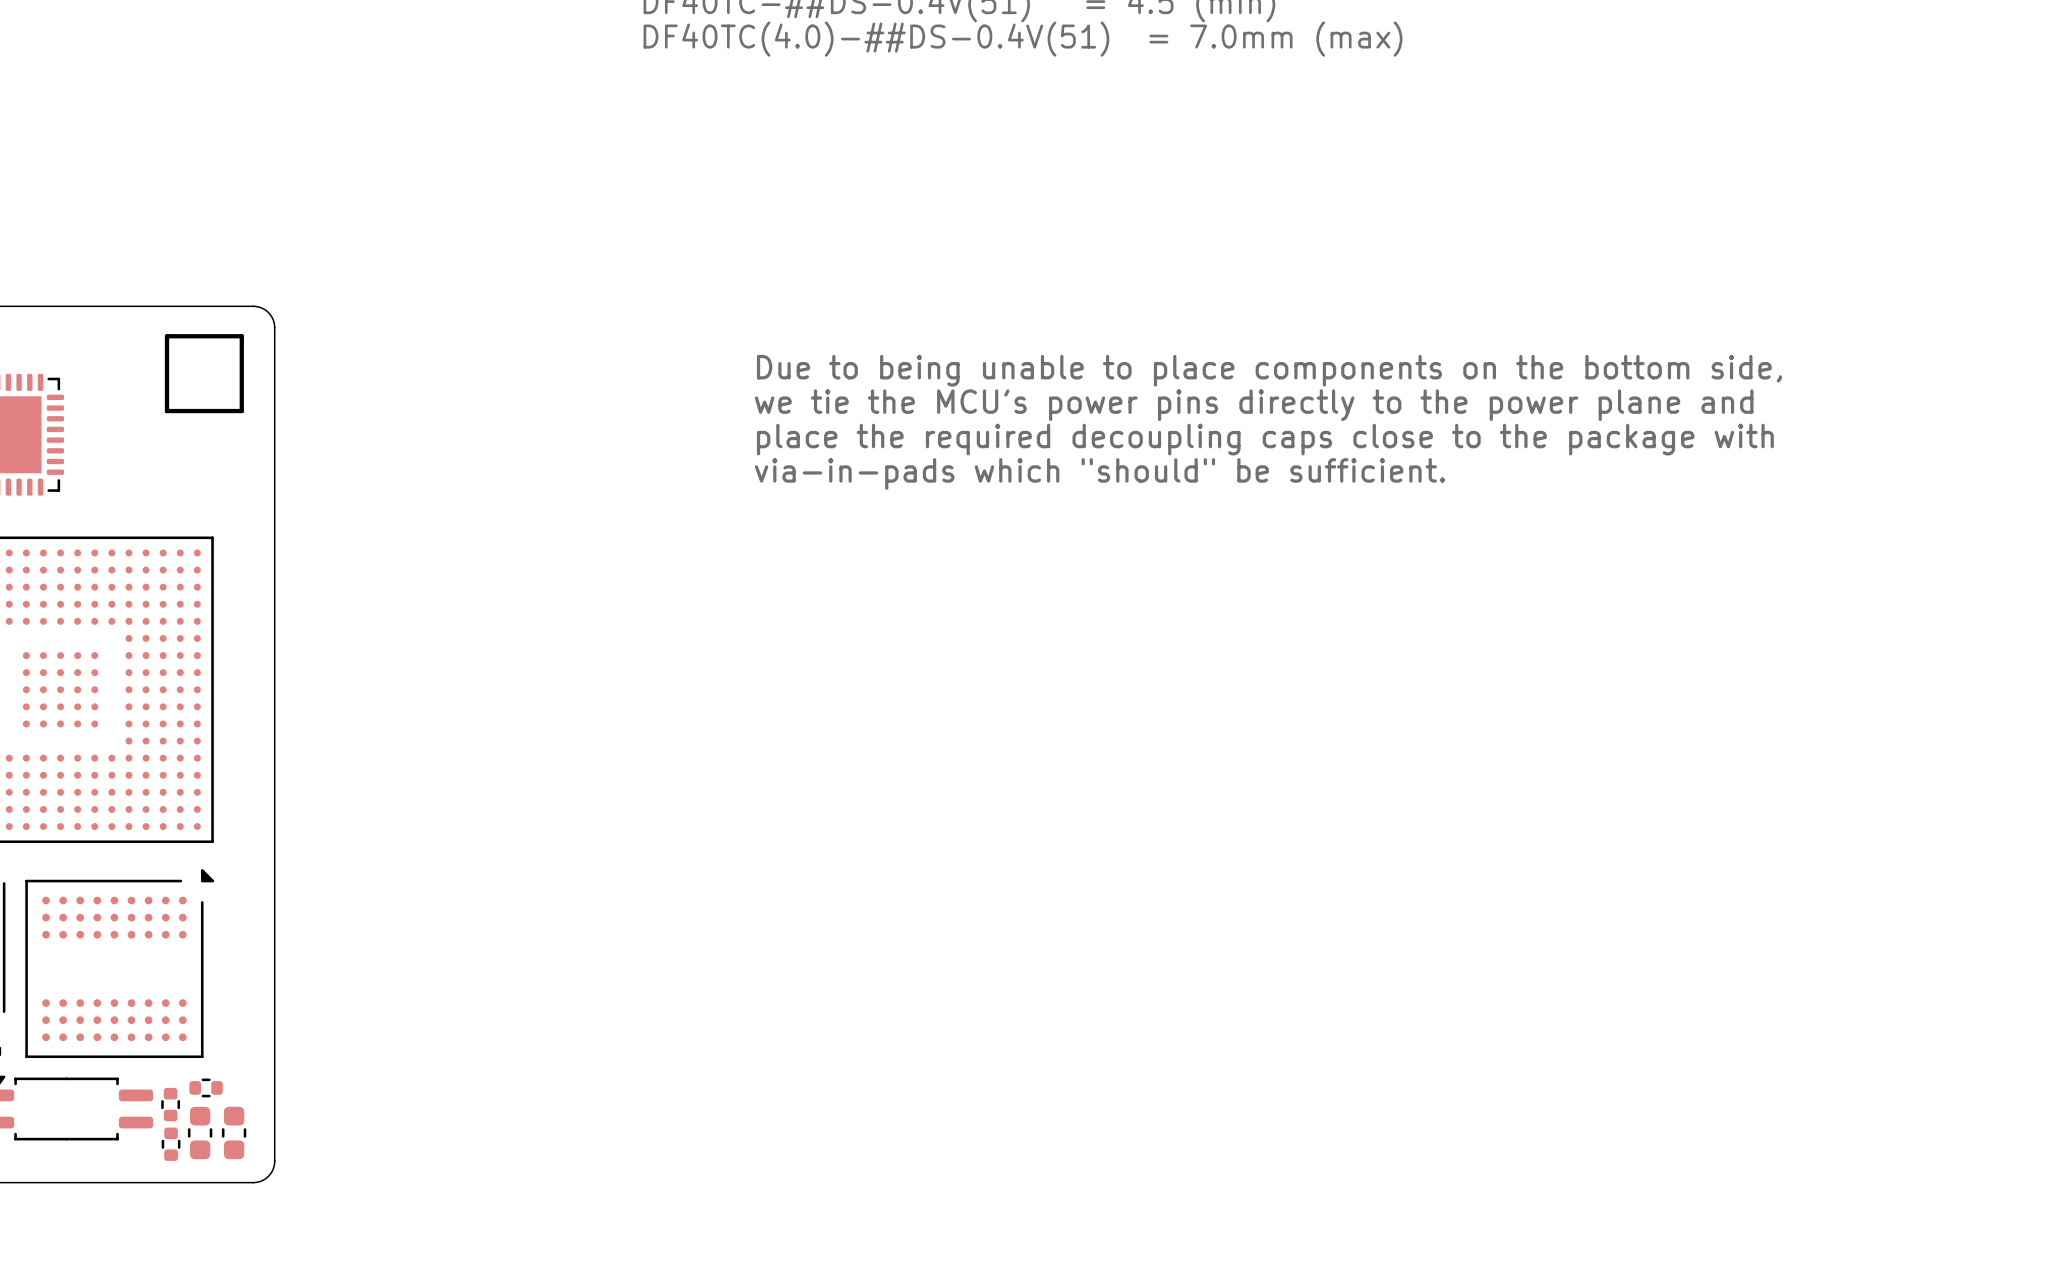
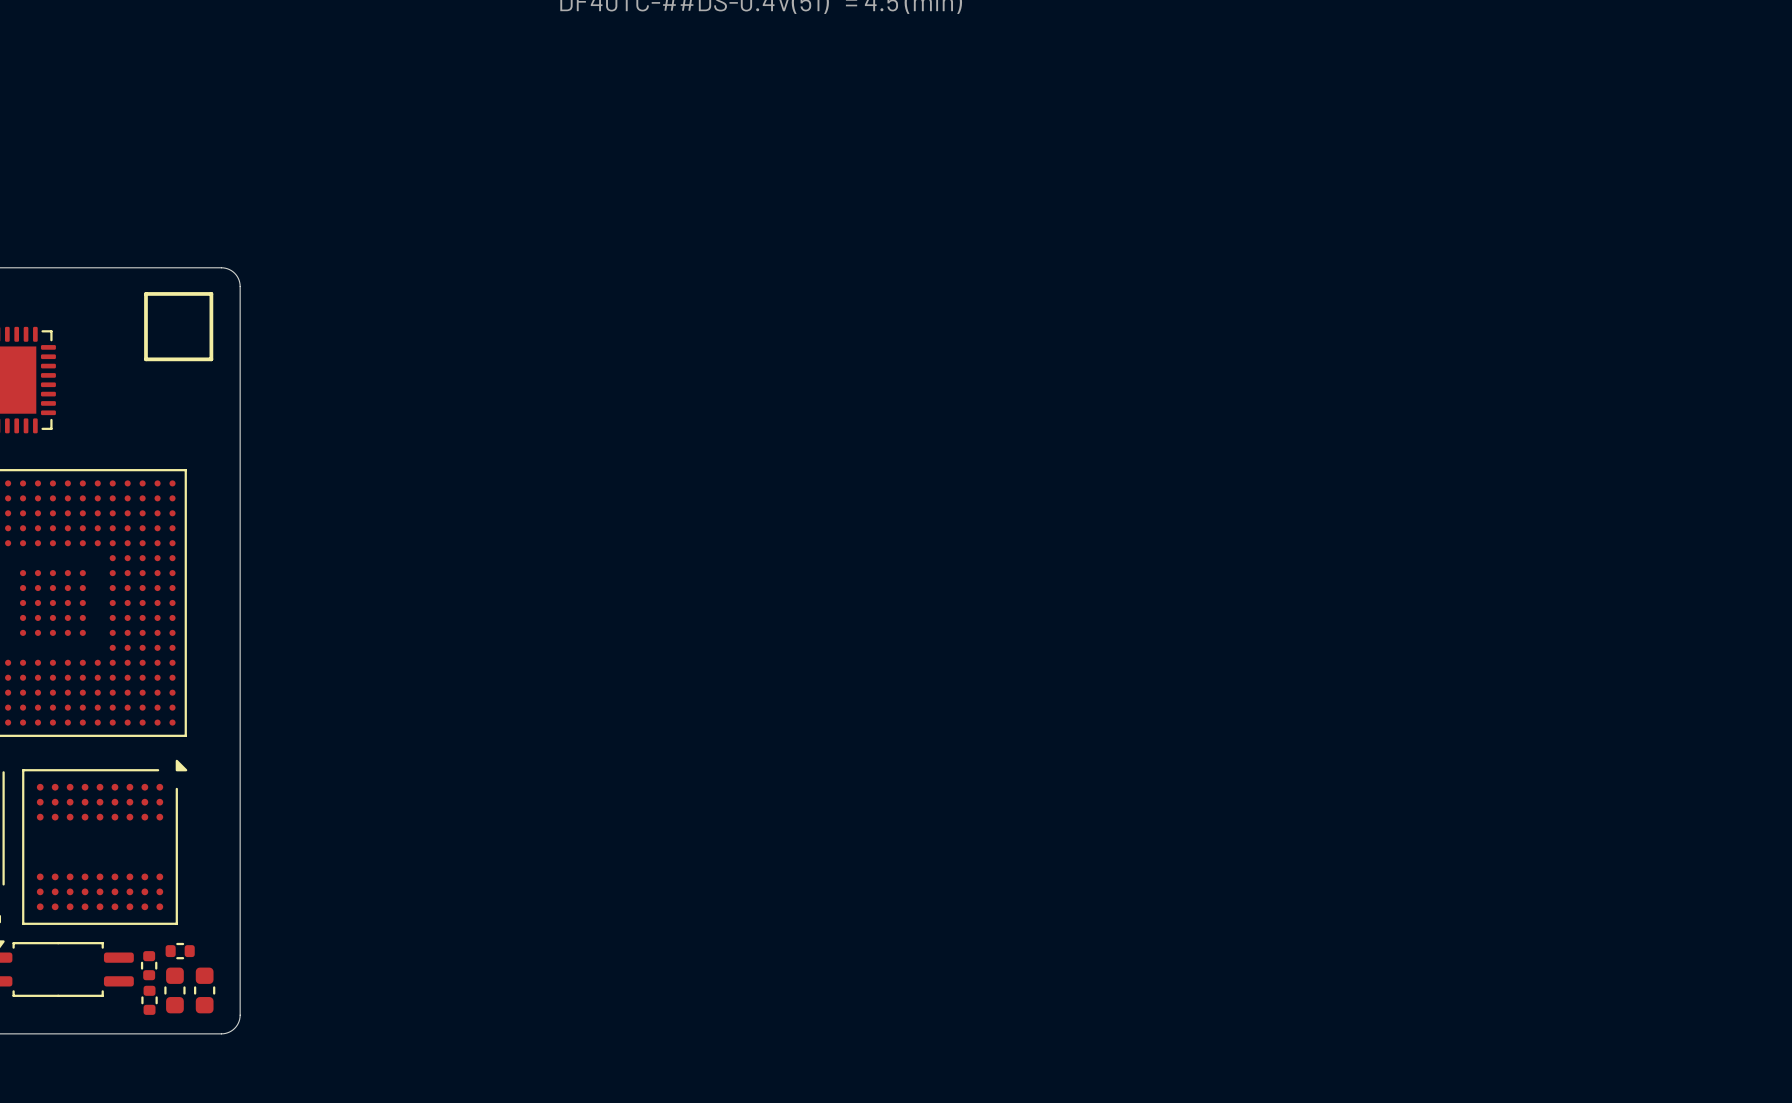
text: DF40TC(4.0)-##DS-0.4V(51) = 7.0mm (max) (1023, 39) -> none
text: Due to being unable to place components on the bottom side, (1269, 370) -> none
text: we tie the MCU's power pins directly to the power plane and (1254, 405) -> none
text: place the required decoupling caps close to the package with (1265, 439) -> none
text: via-in-pads which "should" be sufficient. (1099, 473) -> none

